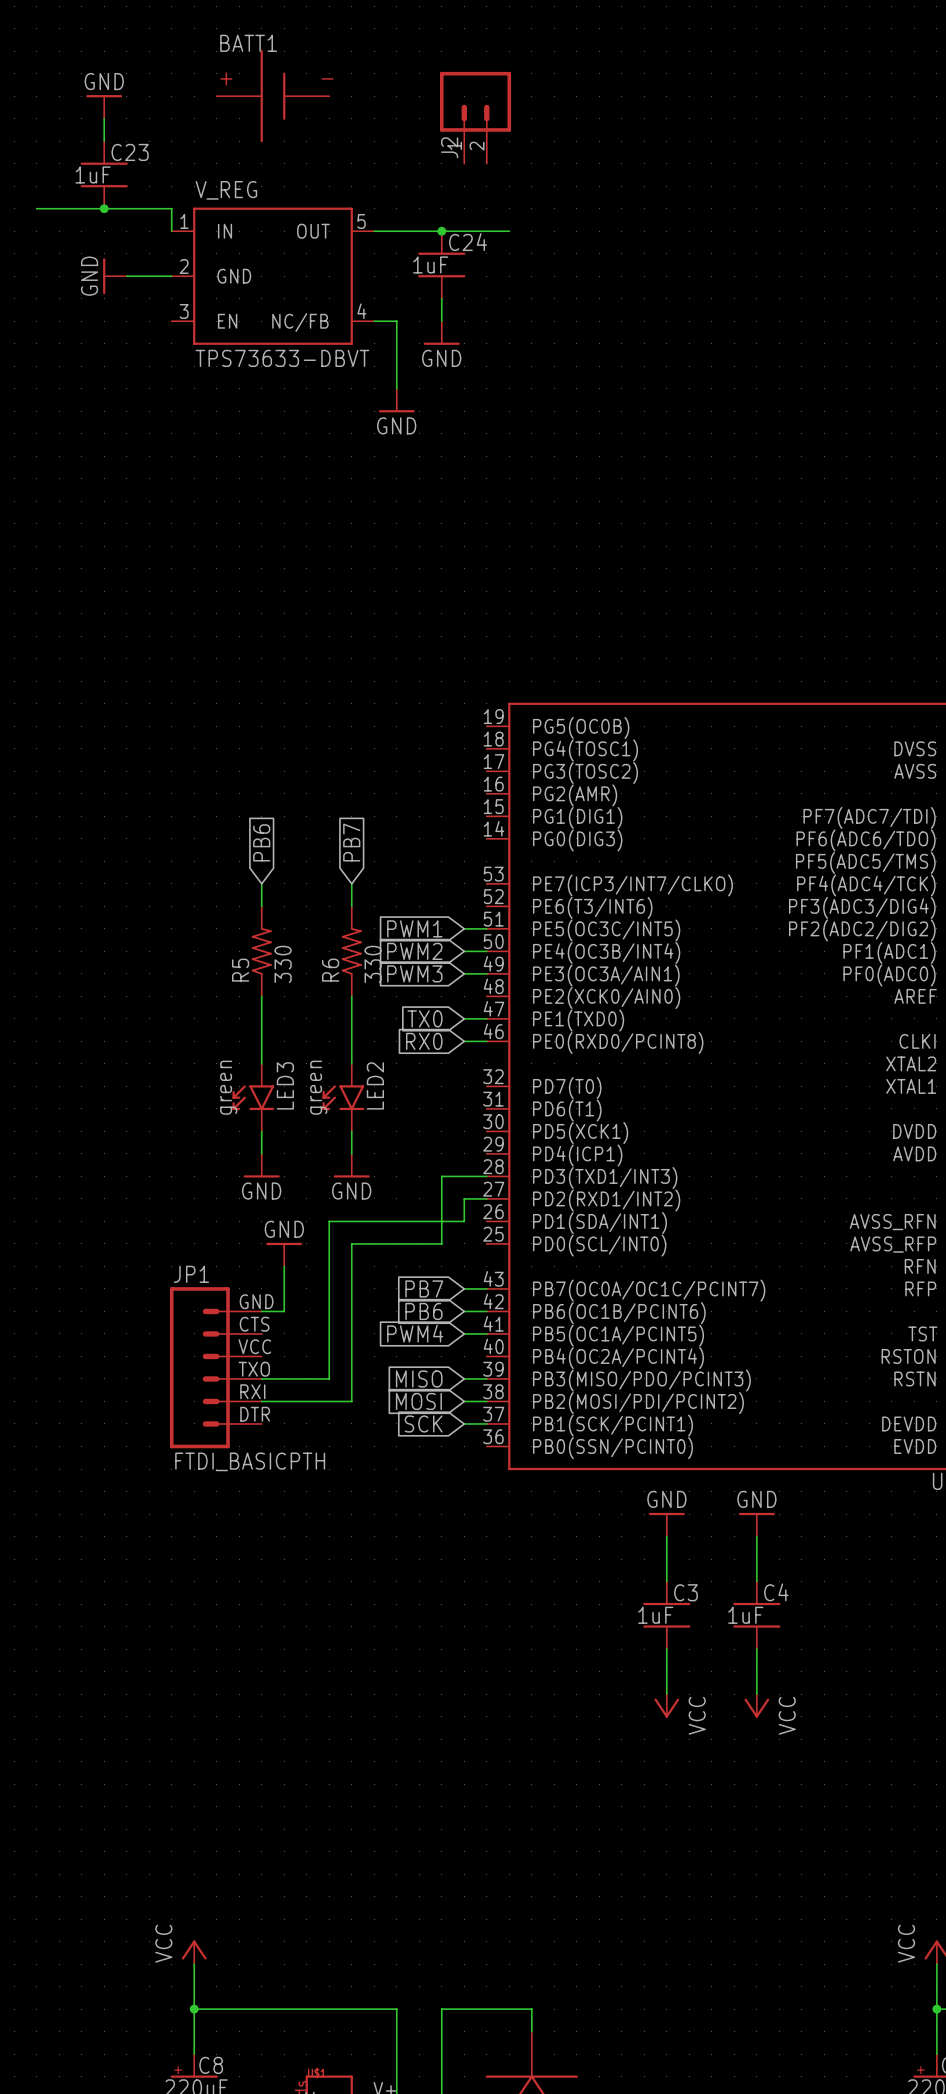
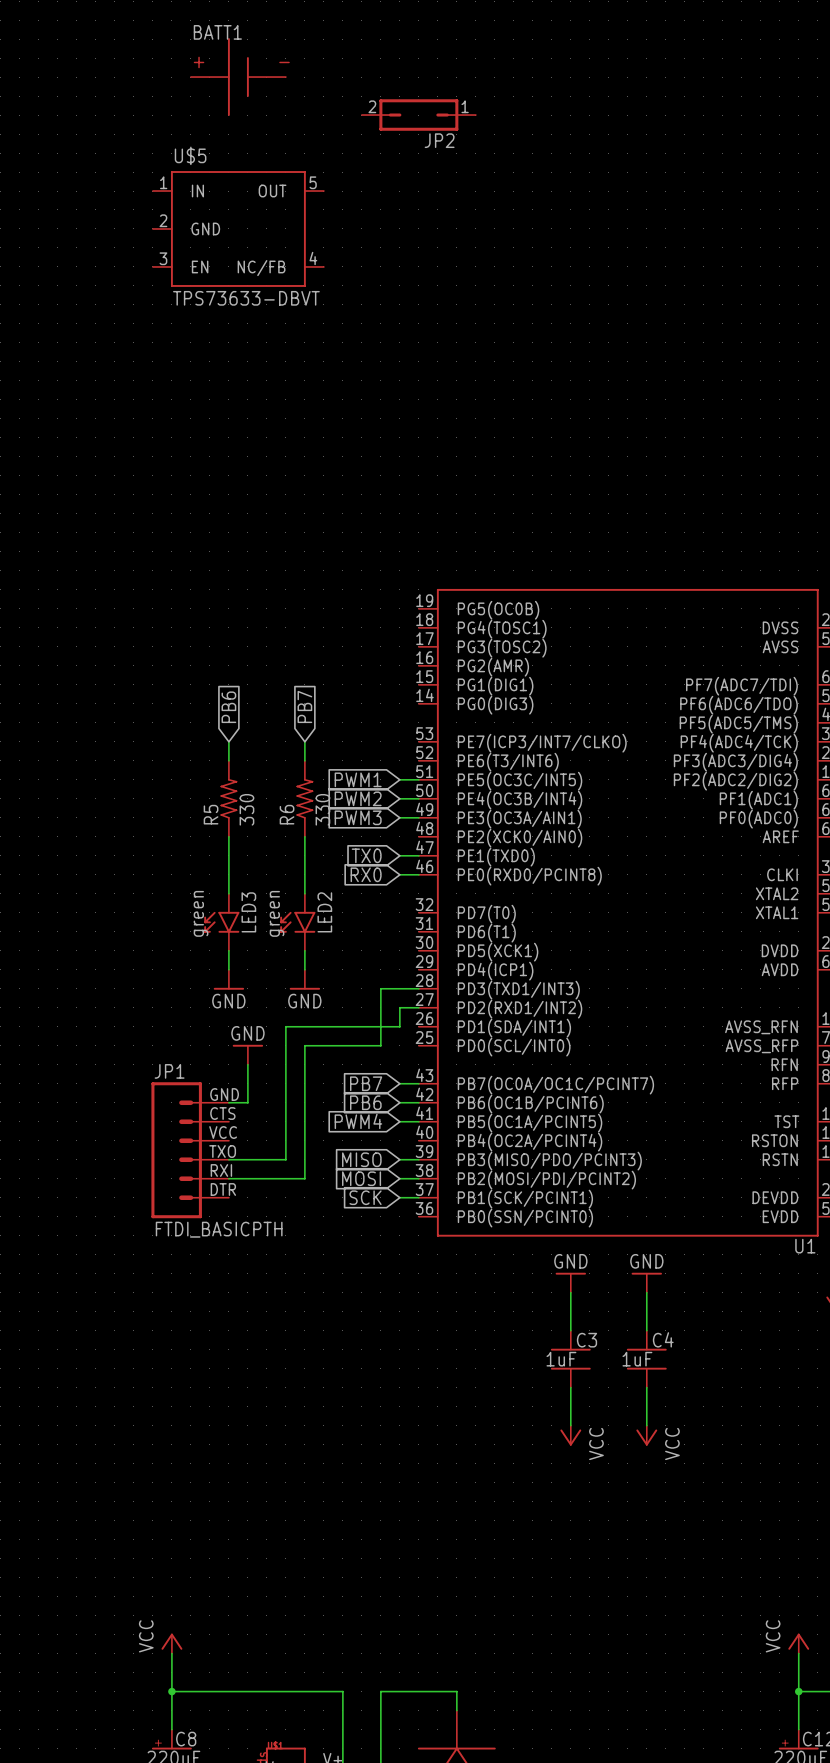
power symbol: GND (104, 106) -> none
J2: (475, 117) -> none
wire: (104, 118) (104, 141) -> none
JP2: none -> (418, 115)
C23: 1uF (104, 174) -> none
V_REG name: V_REG (226, 190) -> U$5 (190, 155)
wire: (36, 208) (171, 208) (171, 231) -> none
junction: (104, 208) -> none
wire: (374, 231) (509, 231) -> none
junction: (441, 231) -> none
C24: 1uF (441, 264) -> none
power symbol: GND (114, 276) -> none
wire: (126, 276) (171, 276) -> none
wire: (441, 298) (441, 321) -> none
wire: (374, 321) (396, 321) (396, 388) -> none
power symbol: GND (441, 333) -> none
power symbol: GND (396, 400) -> none

